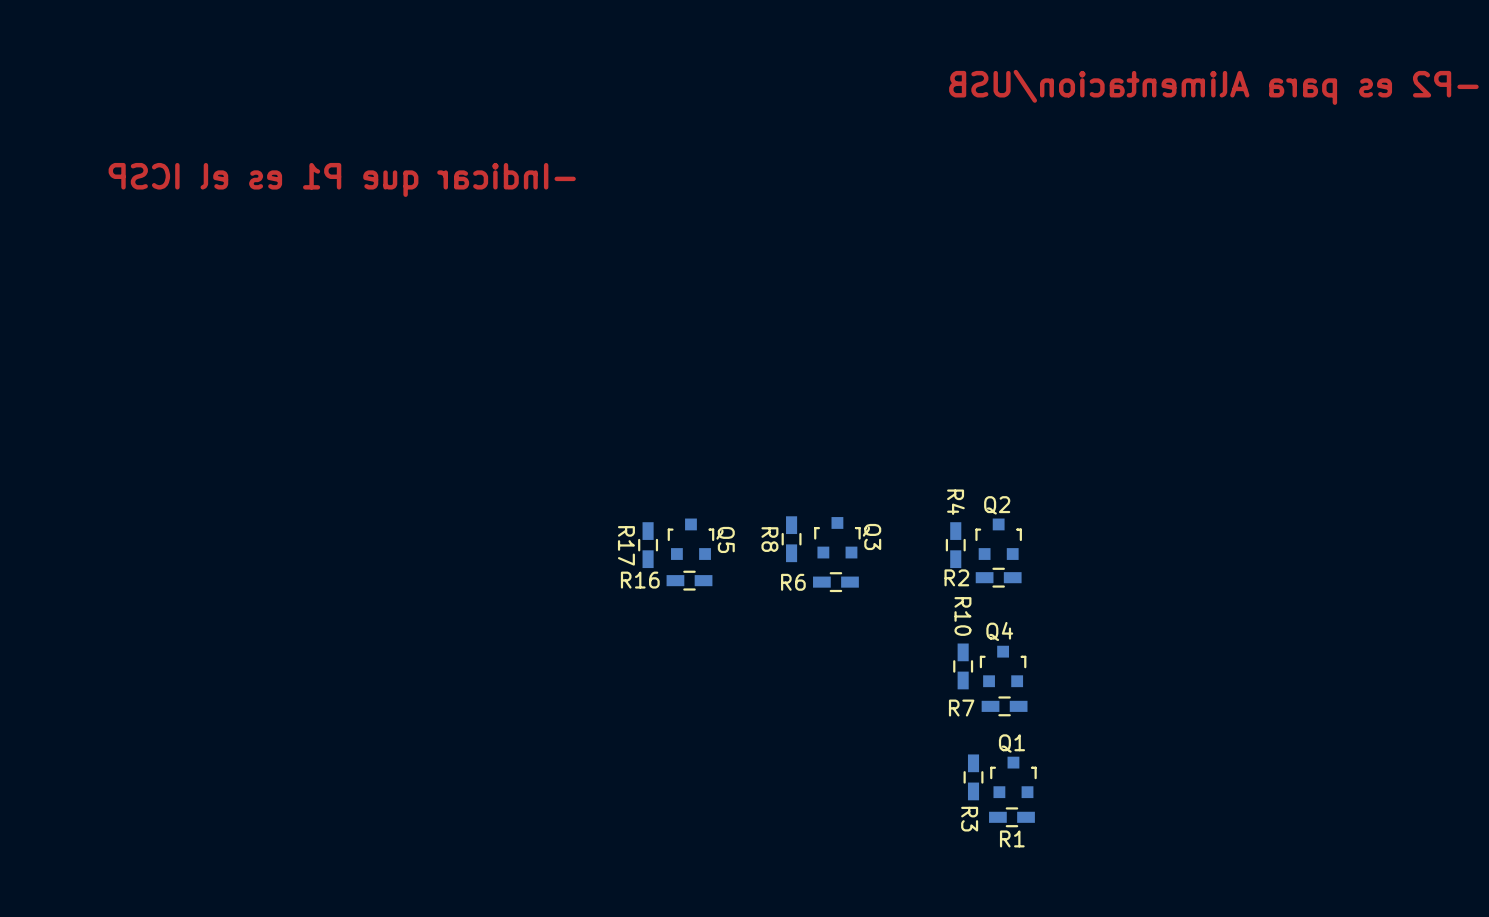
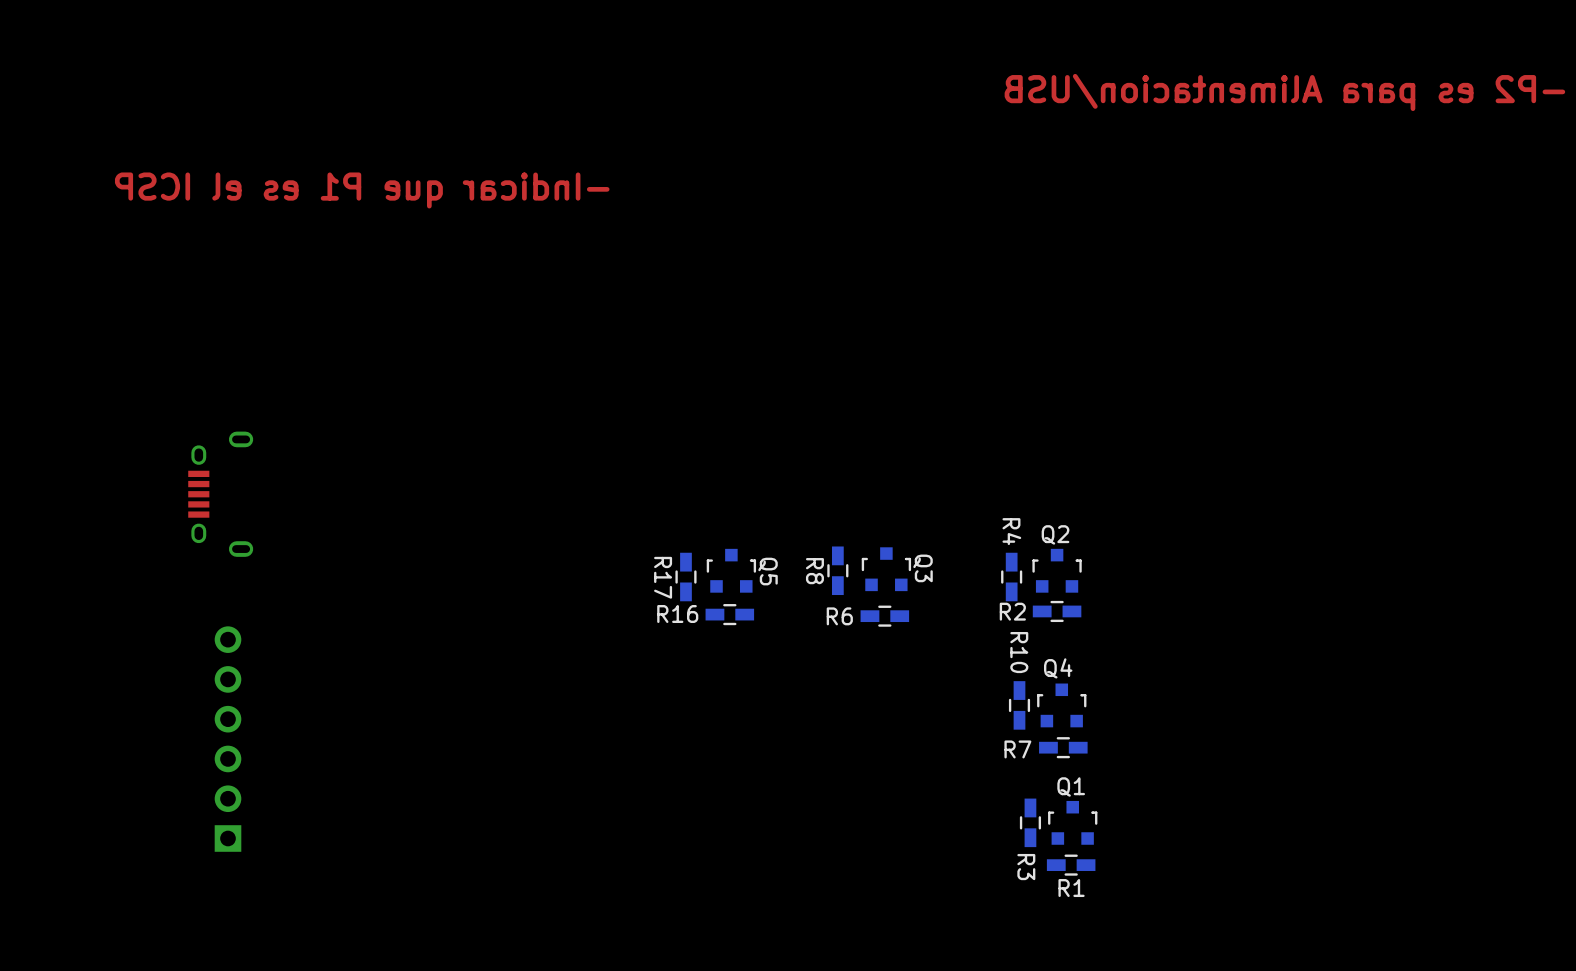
part: none -> (220, 494)
part: none -> (228, 739)

